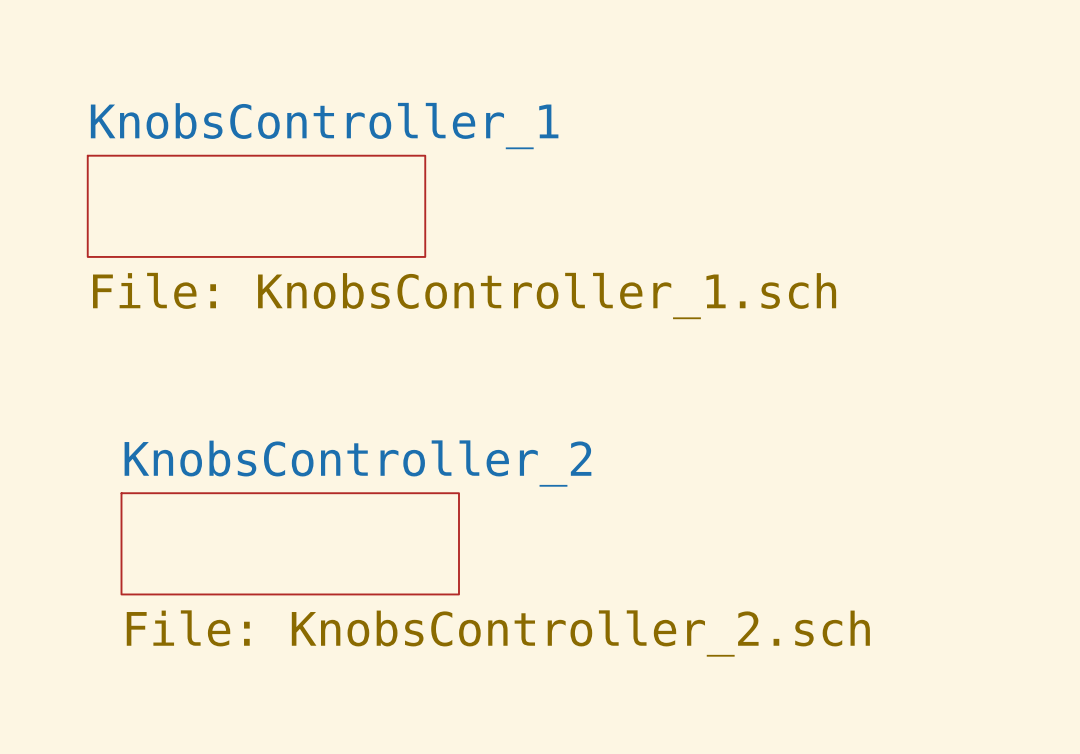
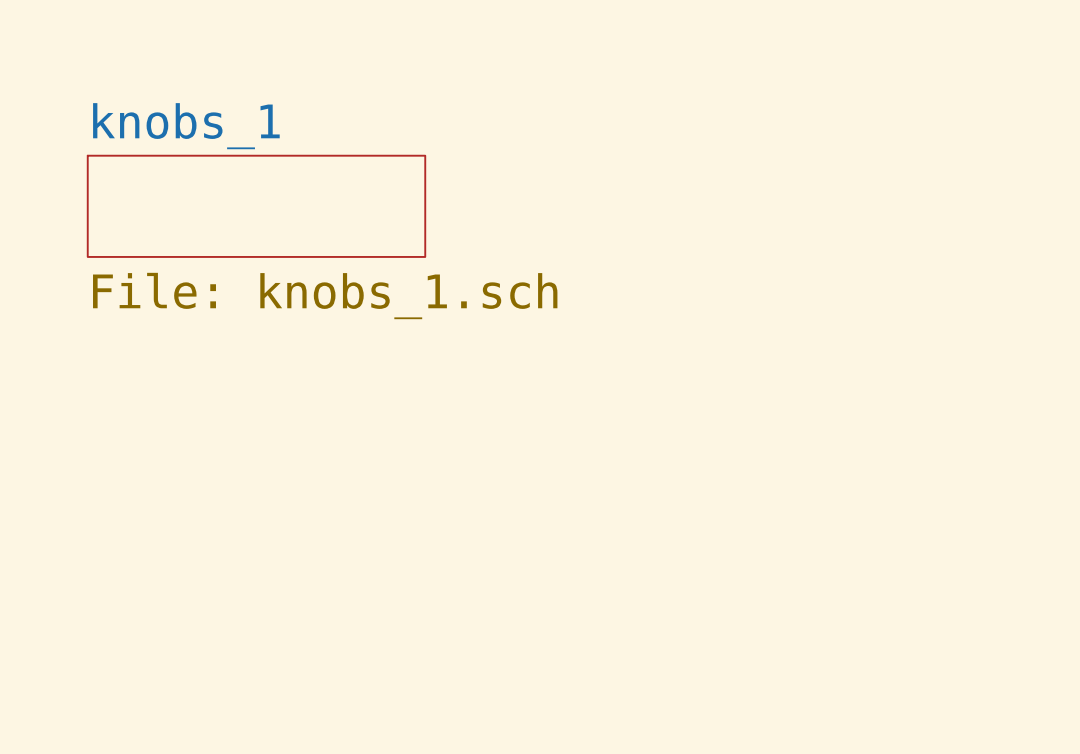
sheet KnobsController_1 name: KnobsController_1 (324, 126) -> knobs_1 (186, 126)
sheet KnobsController_1 value: File: KnobsController_1.sch (464, 296) -> File: knobs_1.sch (325, 296)
sheet KnobsController_2: File: KnobsController_2.sch (290, 543) -> none

